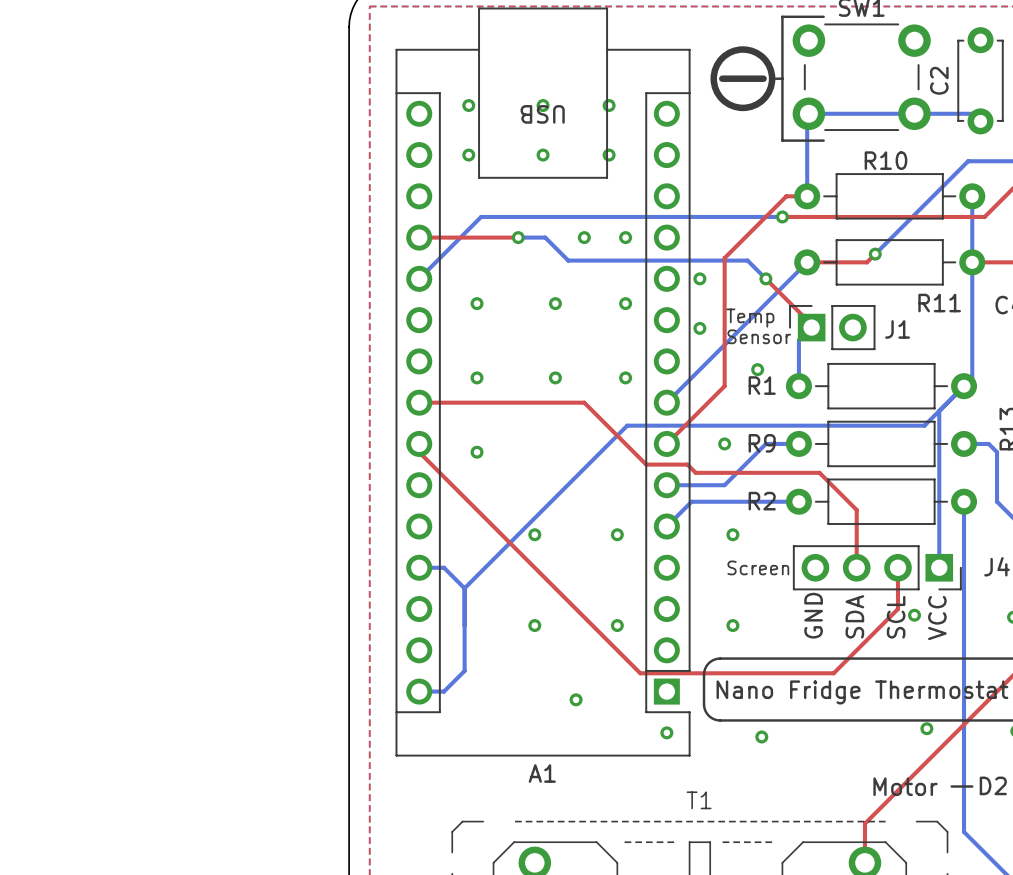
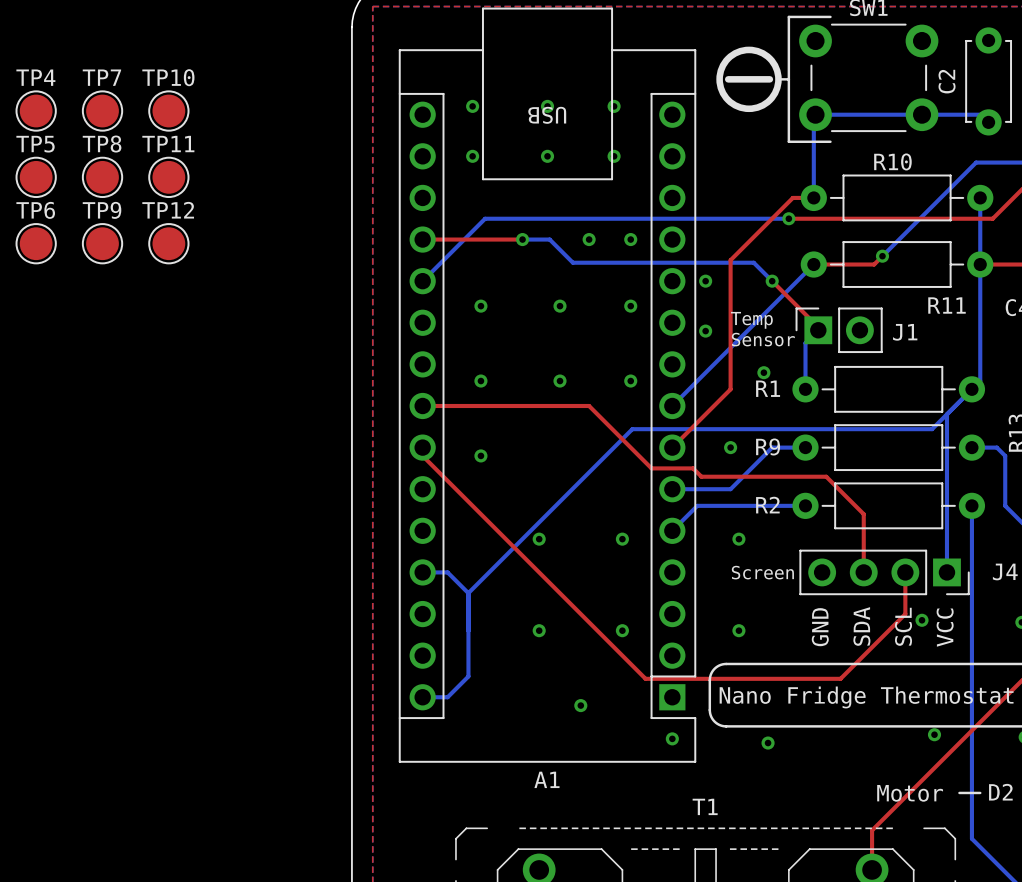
TP4: none -> (36, 111)
TP7: none -> (102, 111)
TP10: none -> (168, 111)
TP5: none -> (36, 177)
TP8: none -> (102, 177)
TP11: none -> (168, 177)
TP6: none -> (36, 243)
TP9: none -> (102, 243)
TP12: none -> (168, 243)

